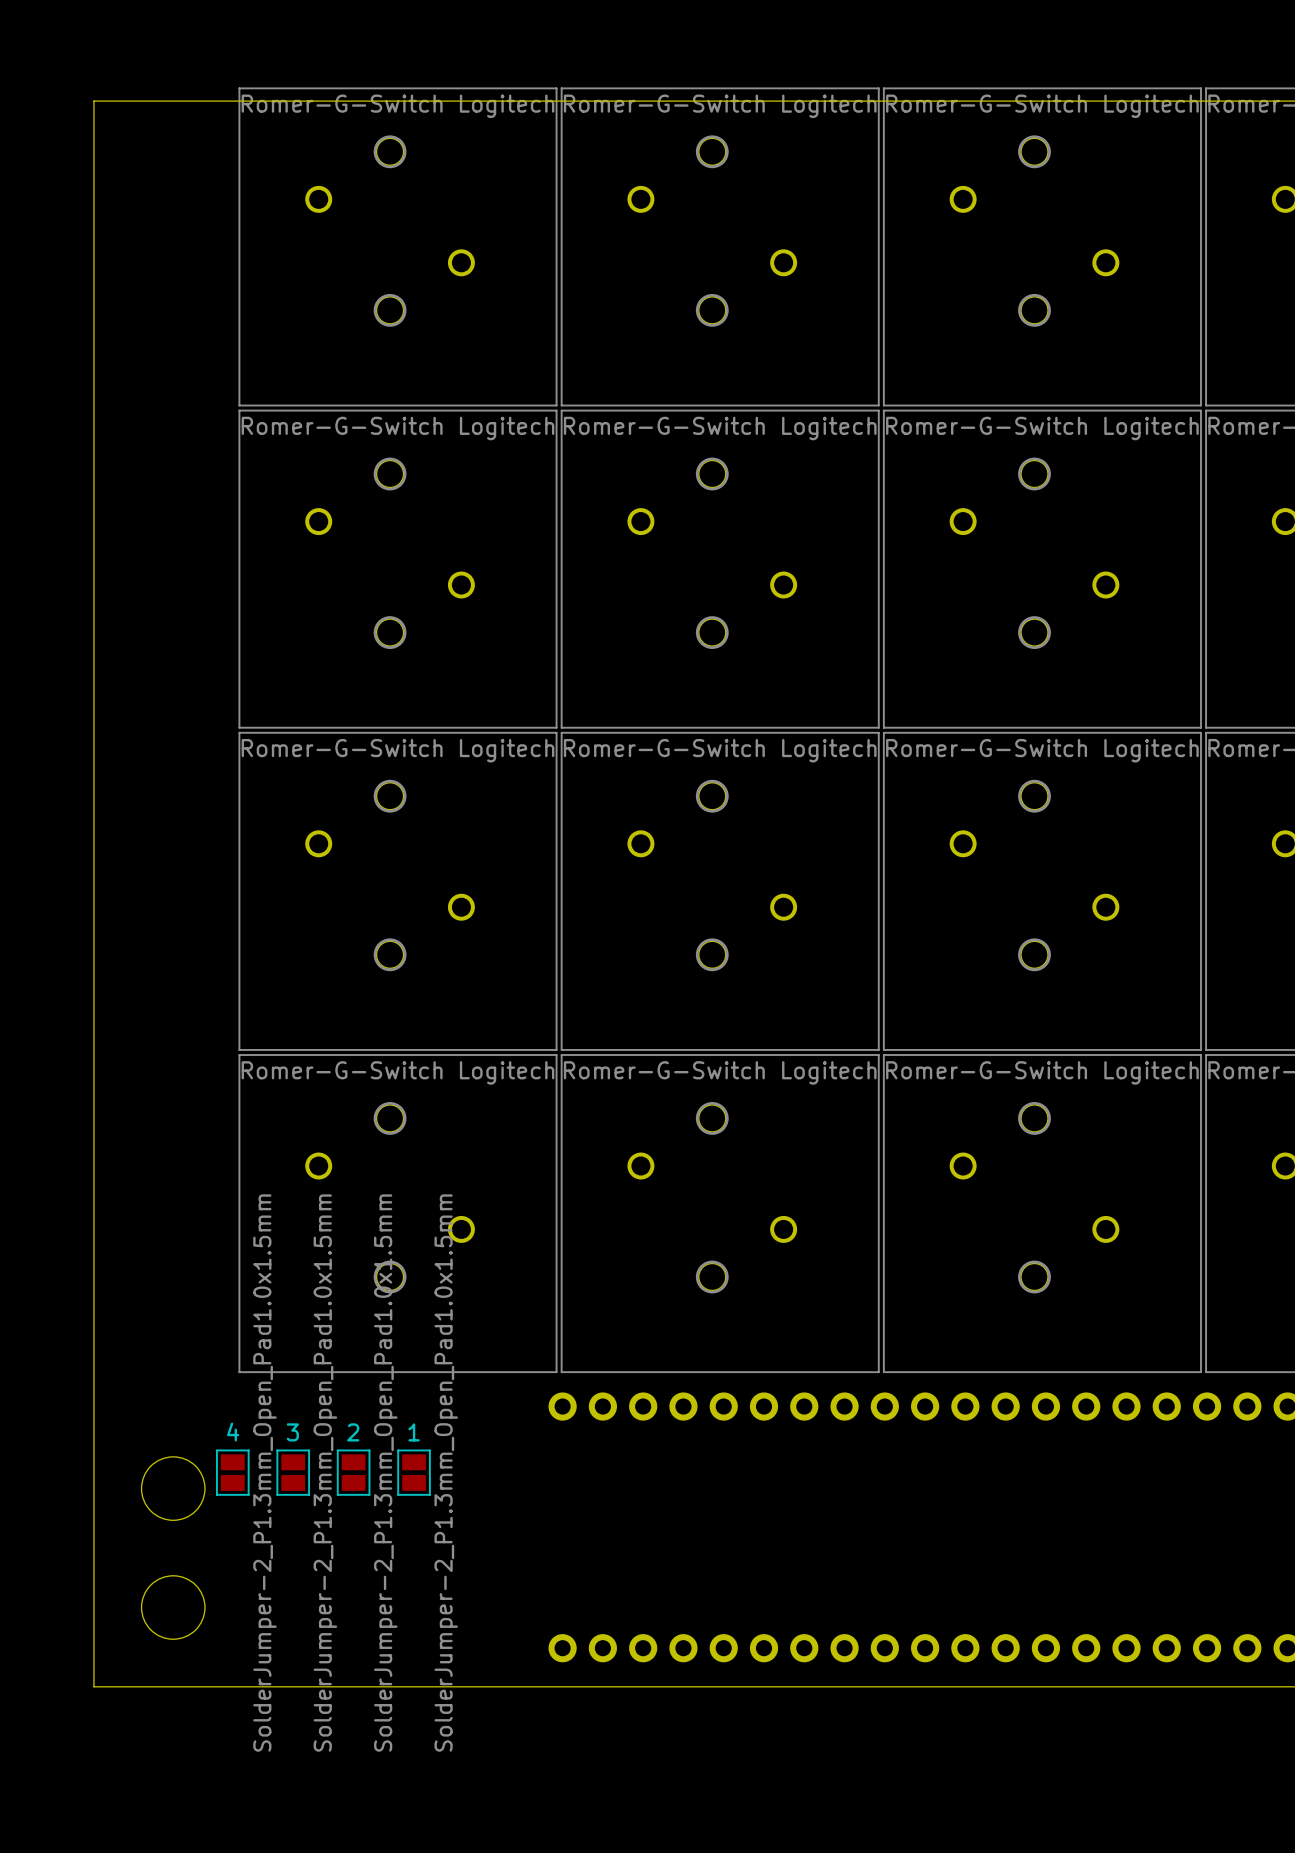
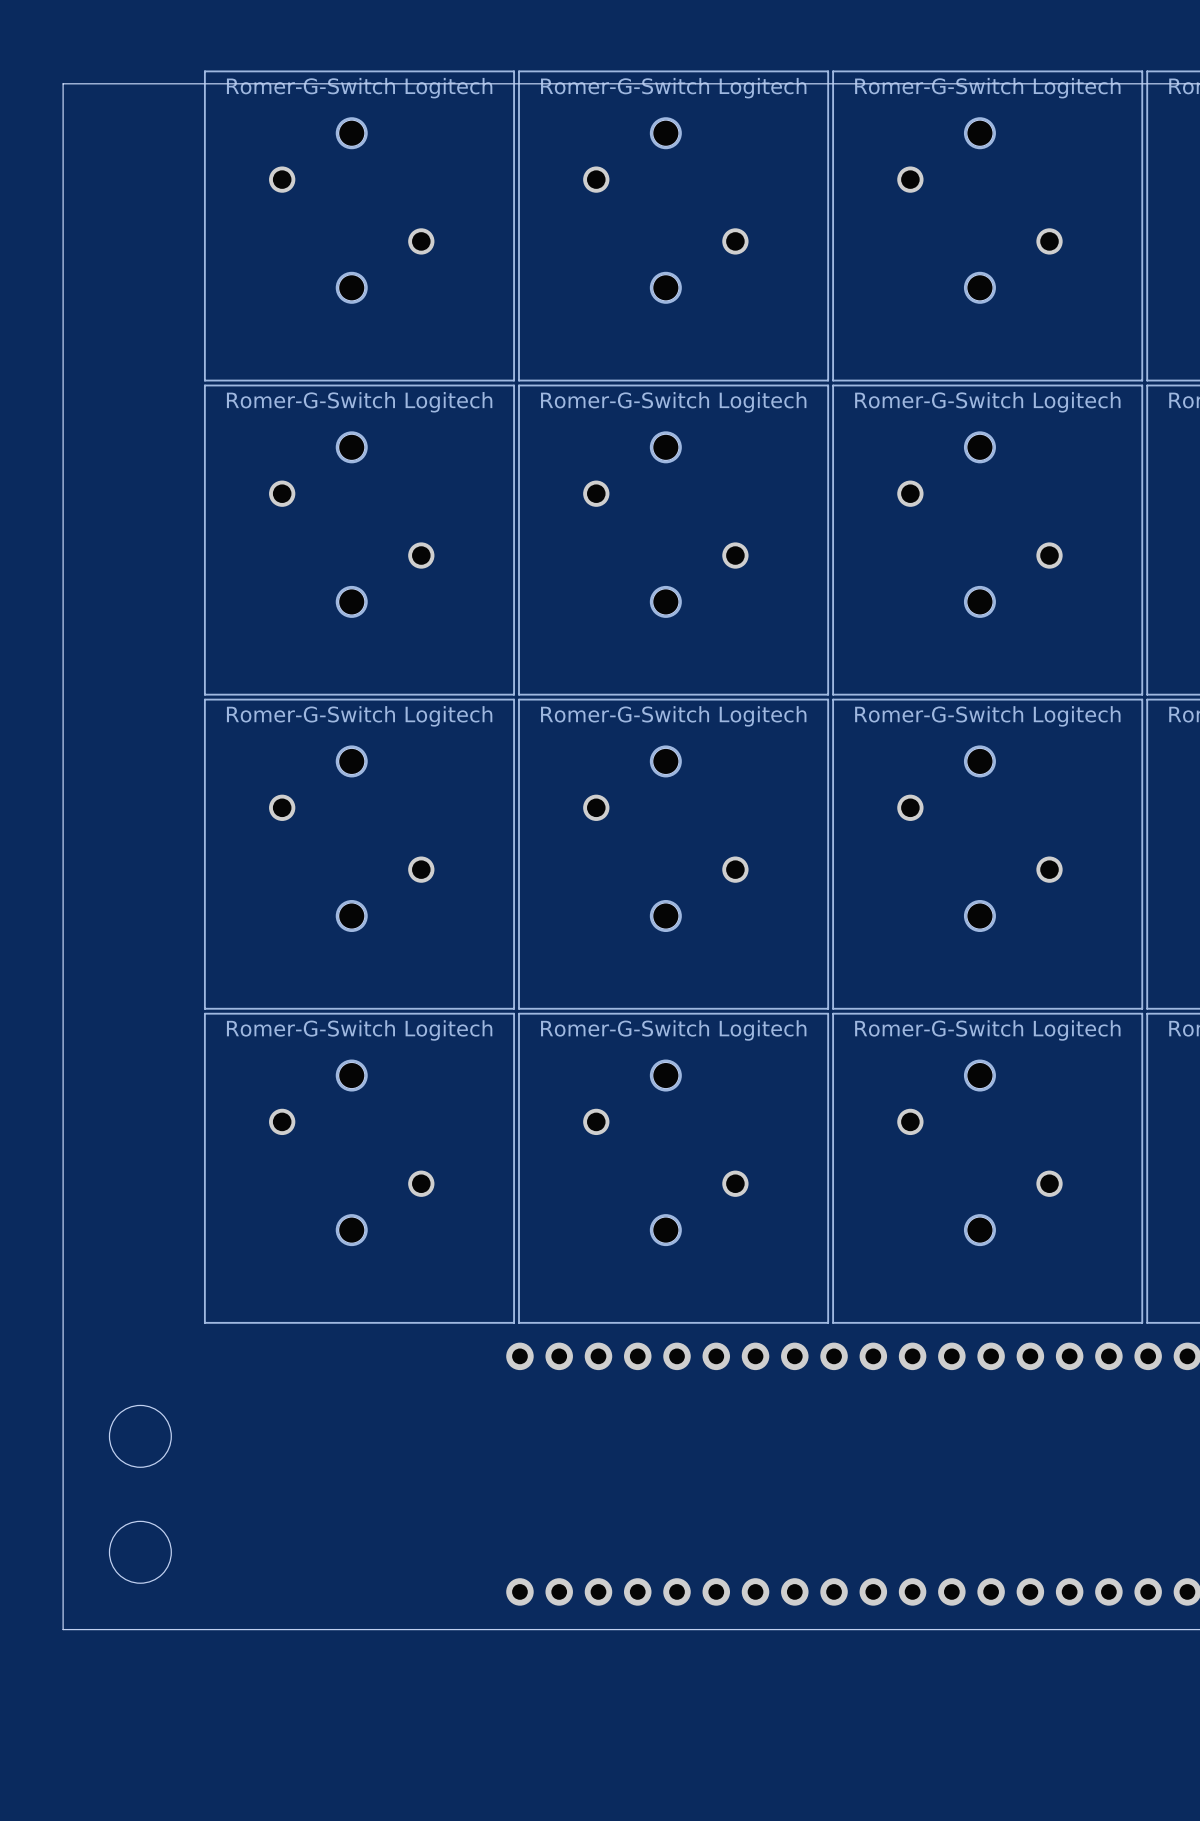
4: SolderJumper-2_P1.3mm_Open_Pad1.0x1.5mm (232, 1472) -> none
3: SolderJumper-2_P1.3mm_Open_Pad1.0x1.5mm (293, 1472) -> none
2: SolderJumper-2_P1.3mm_Open_Pad1.0x1.5mm (353, 1472) -> none
1: SolderJumper-2_P1.3mm_Open_Pad1.0x1.5mm (414, 1472) -> none

